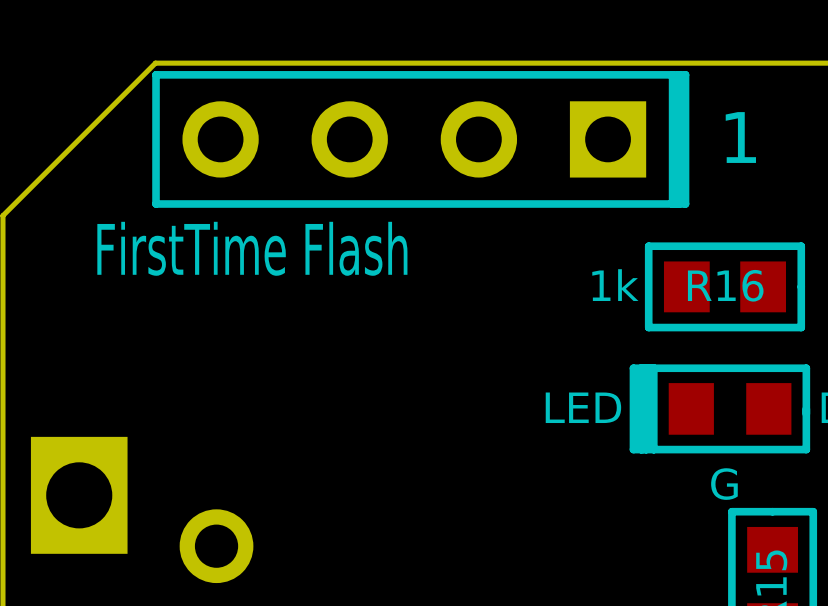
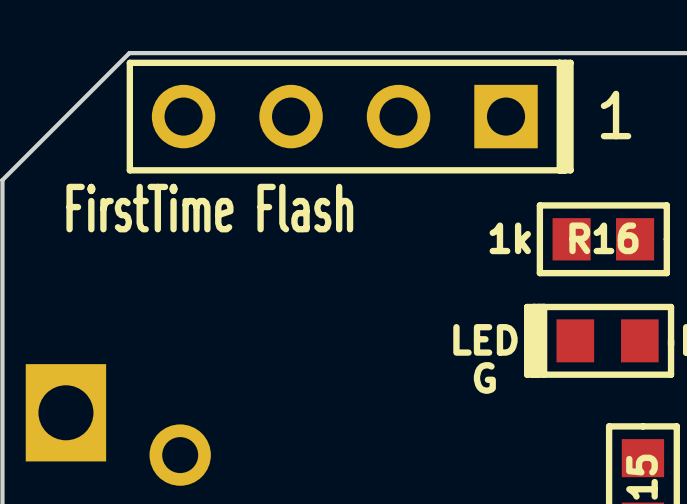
text position: G (724, 484) -> G (484, 377)

